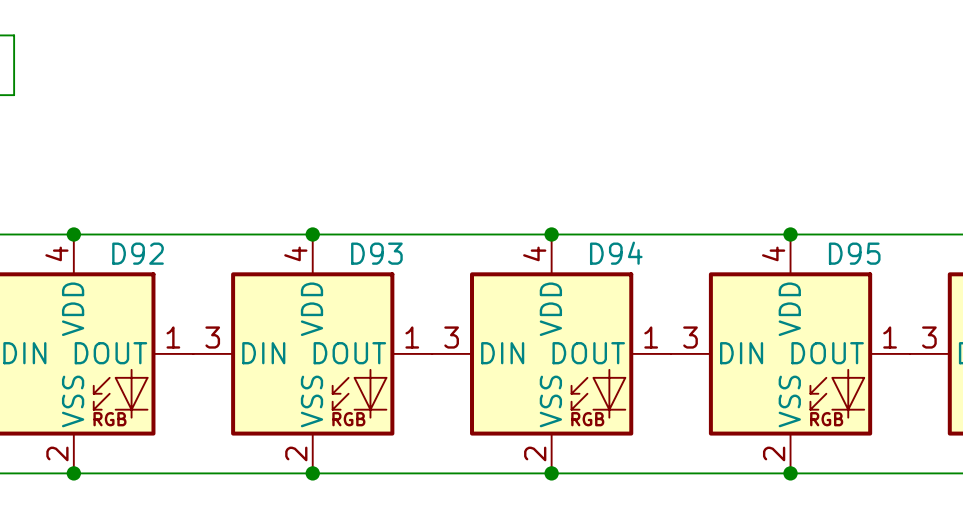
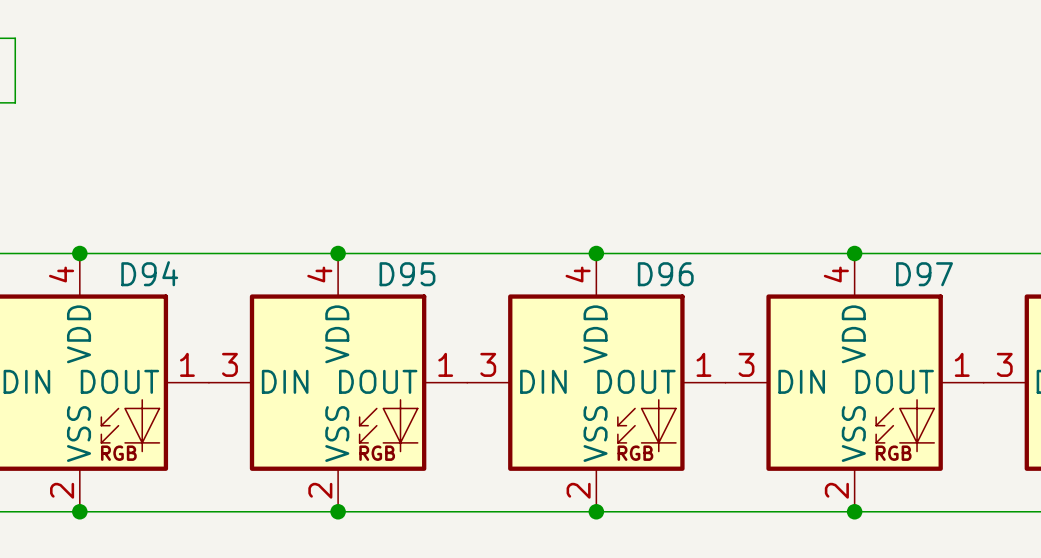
D92 name: D92 (138, 253) -> D94 (149, 273)
D93 name: D93 (376, 253) -> D95 (407, 274)
D94 name: D94 (616, 253) -> D96 (665, 274)
D95 name: D95 (854, 253) -> D97 (924, 274)

